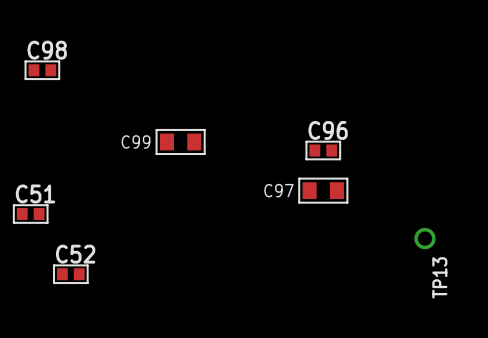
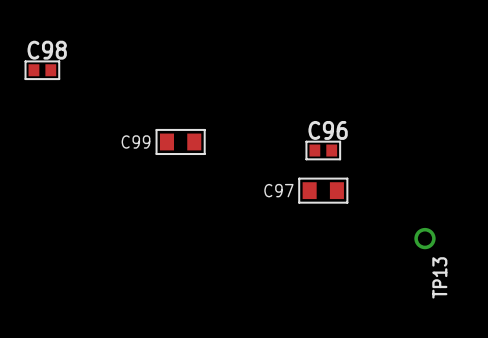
C51: (30, 214) -> none
C52: (70, 274) -> none

